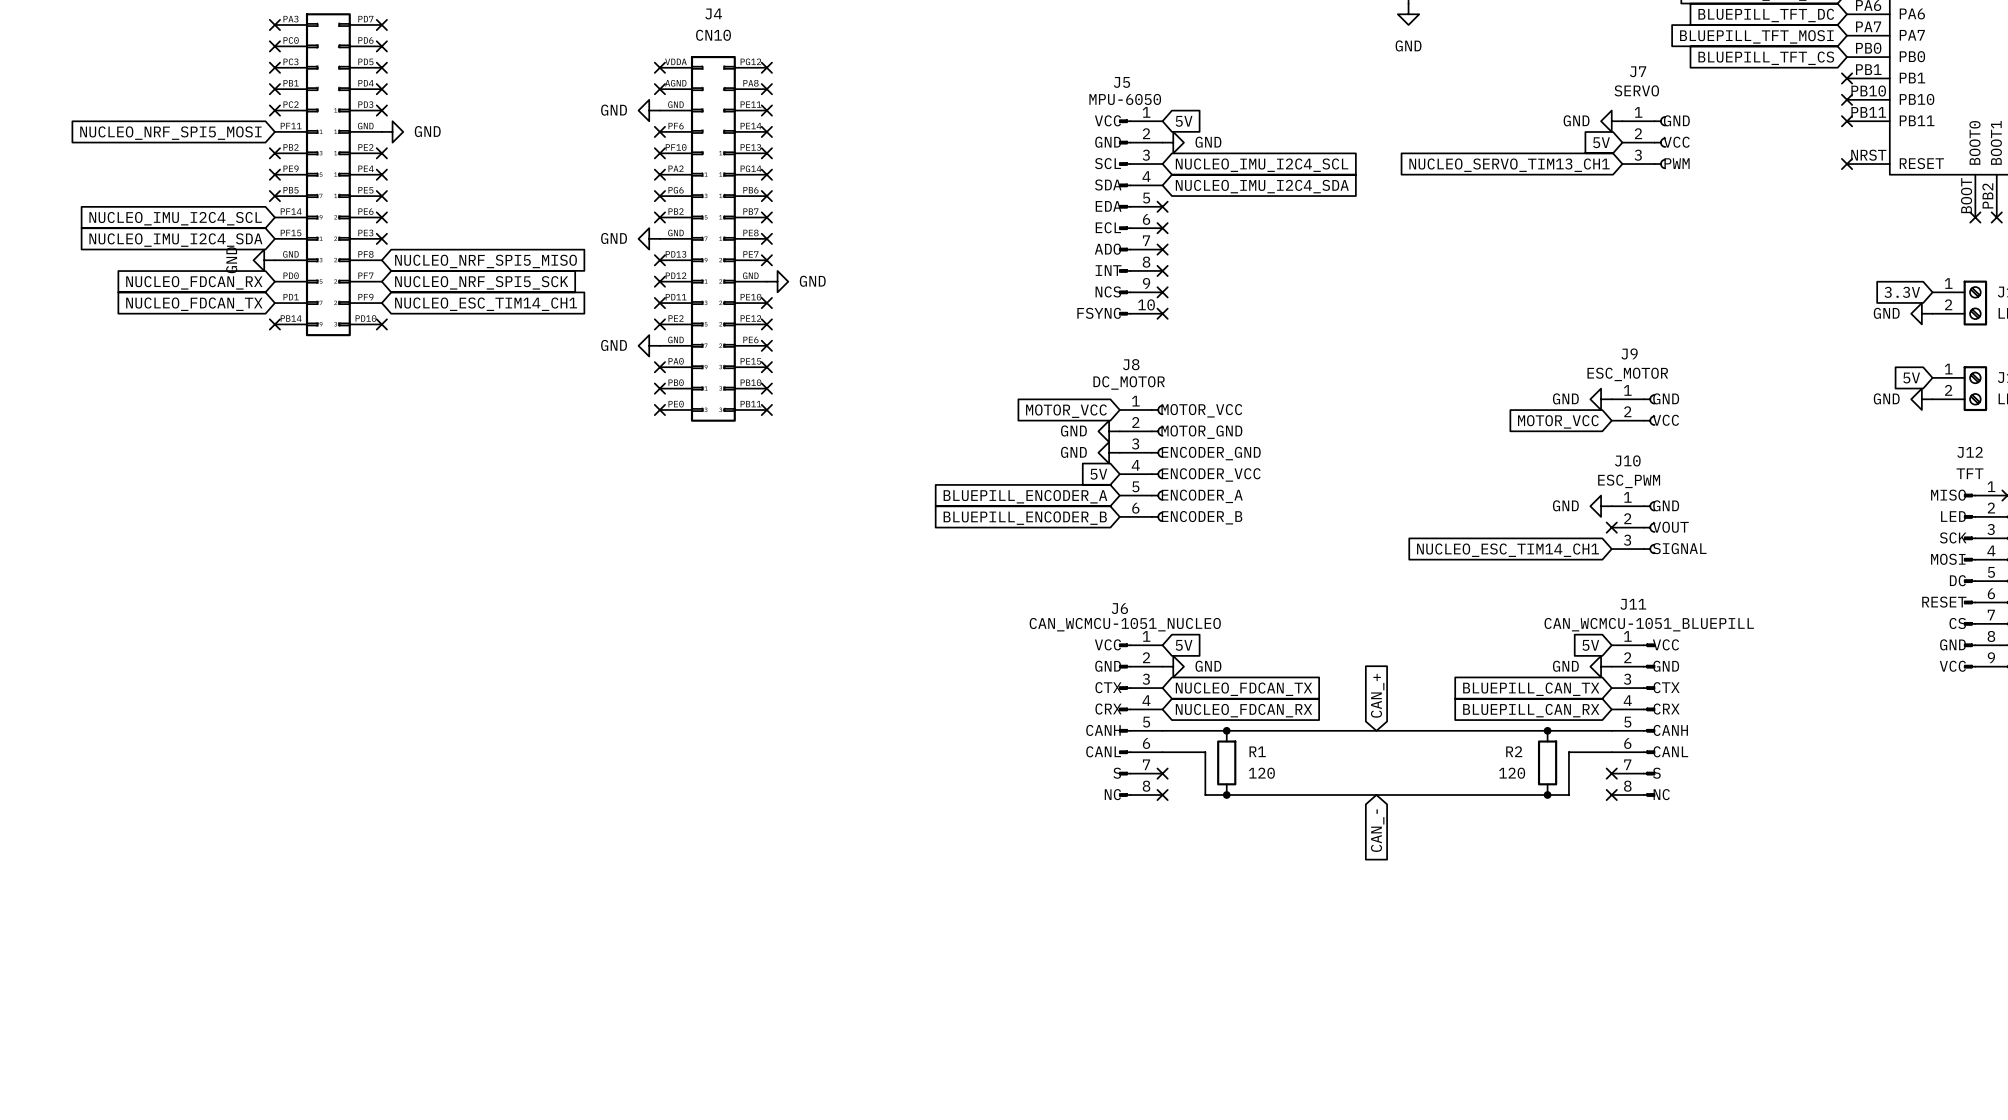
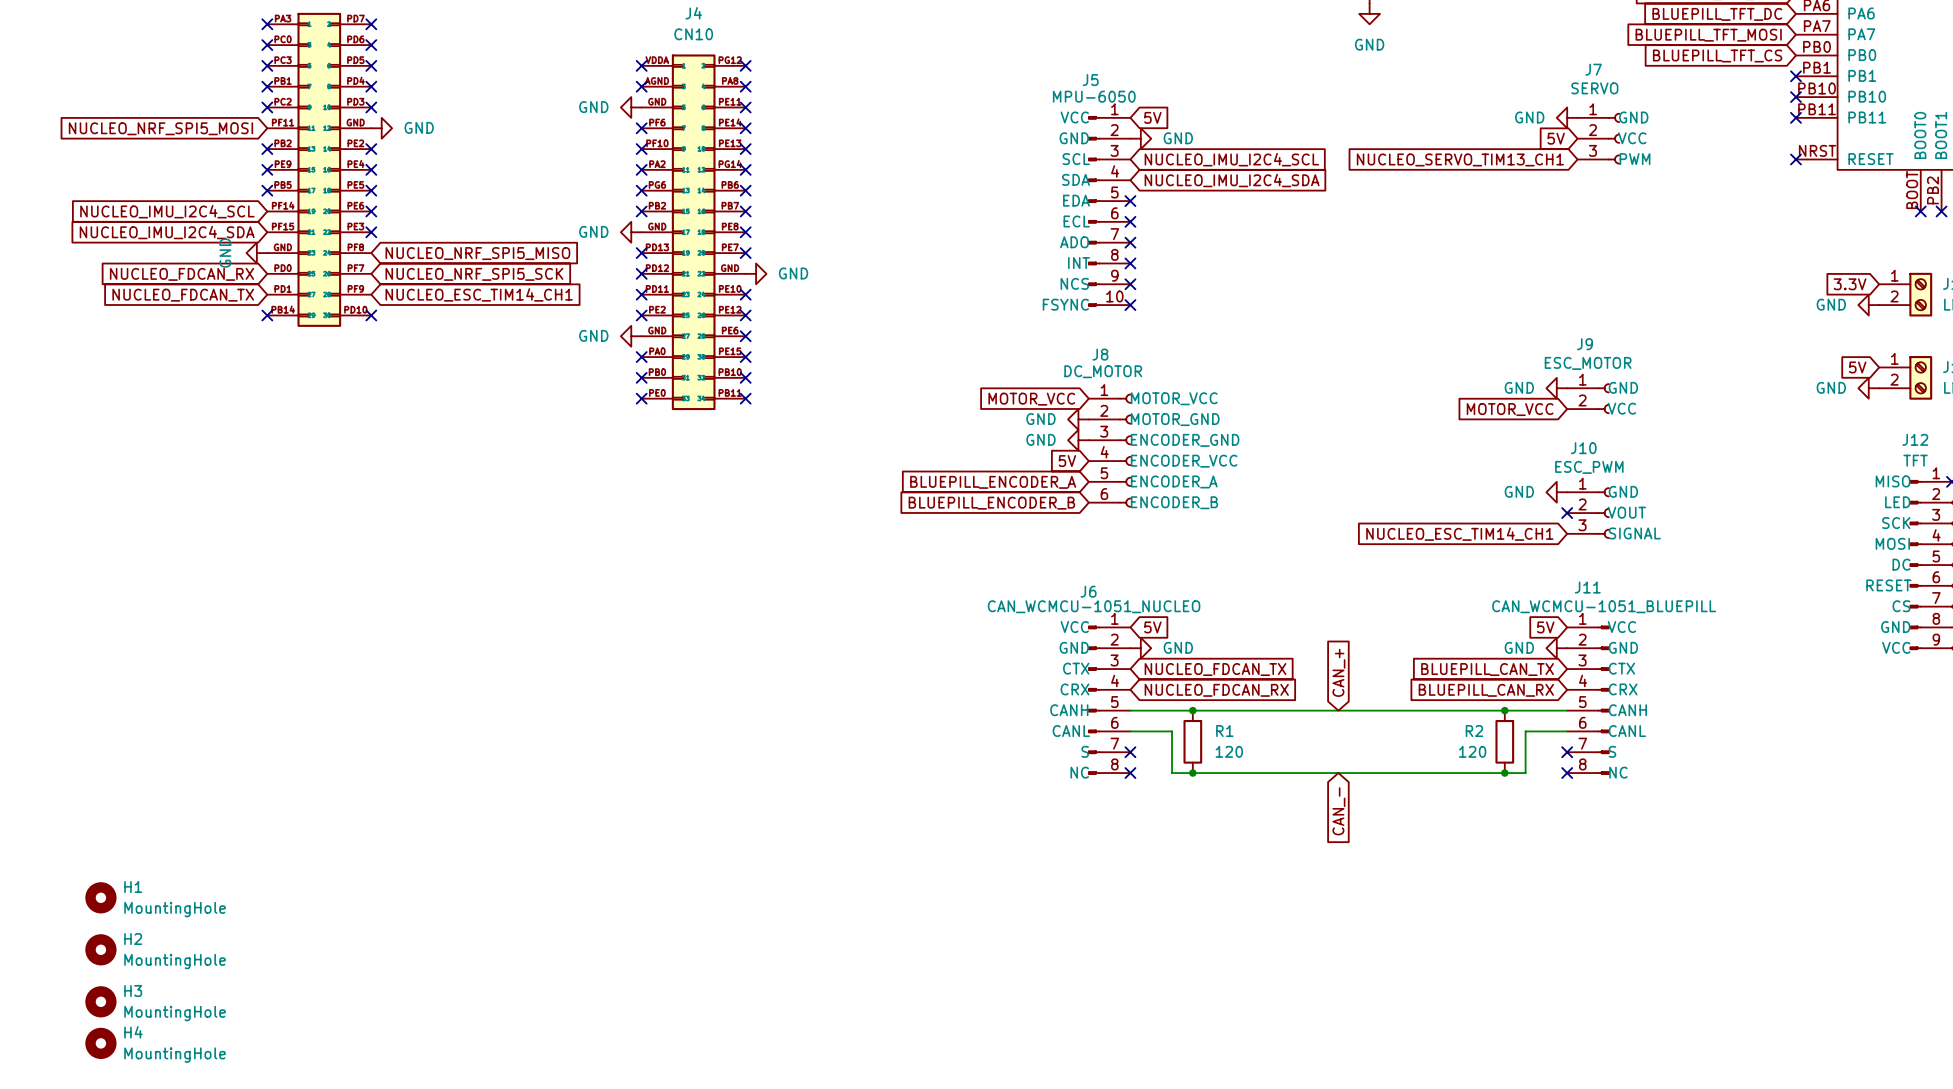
H1: none -> MountingHole (100, 897)
H2: none -> MountingHole (100, 949)
H3: none -> MountingHole (100, 1001)
H4: none -> MountingHole (100, 1043)

